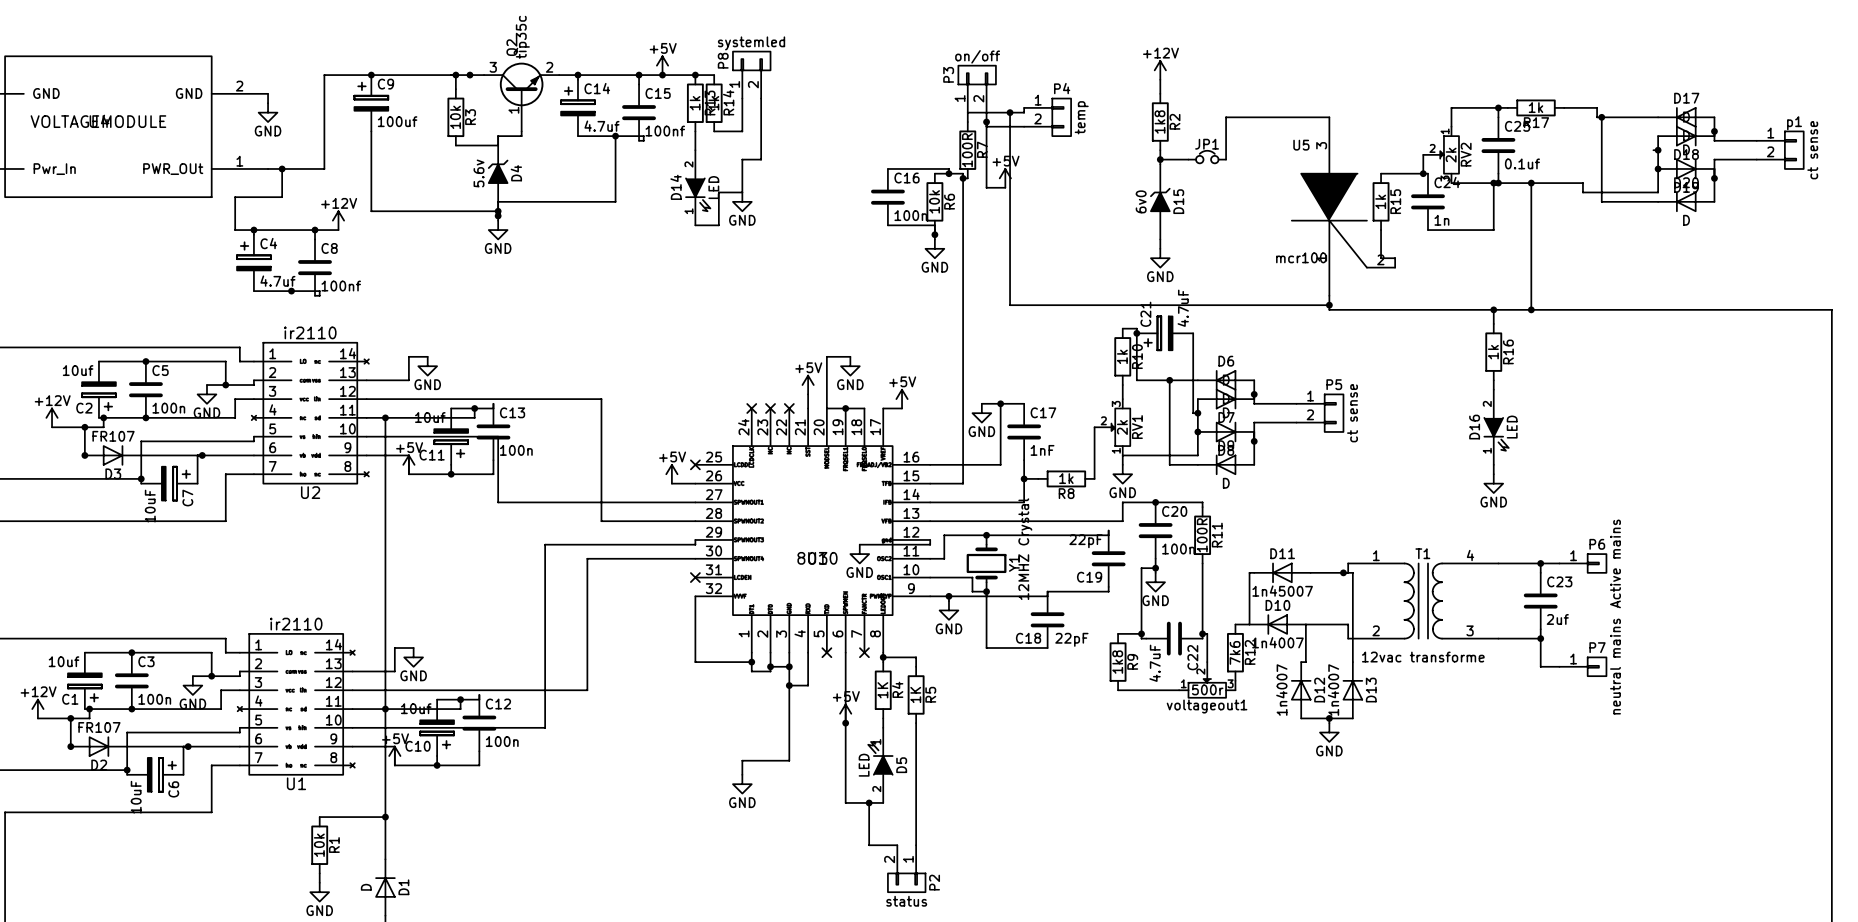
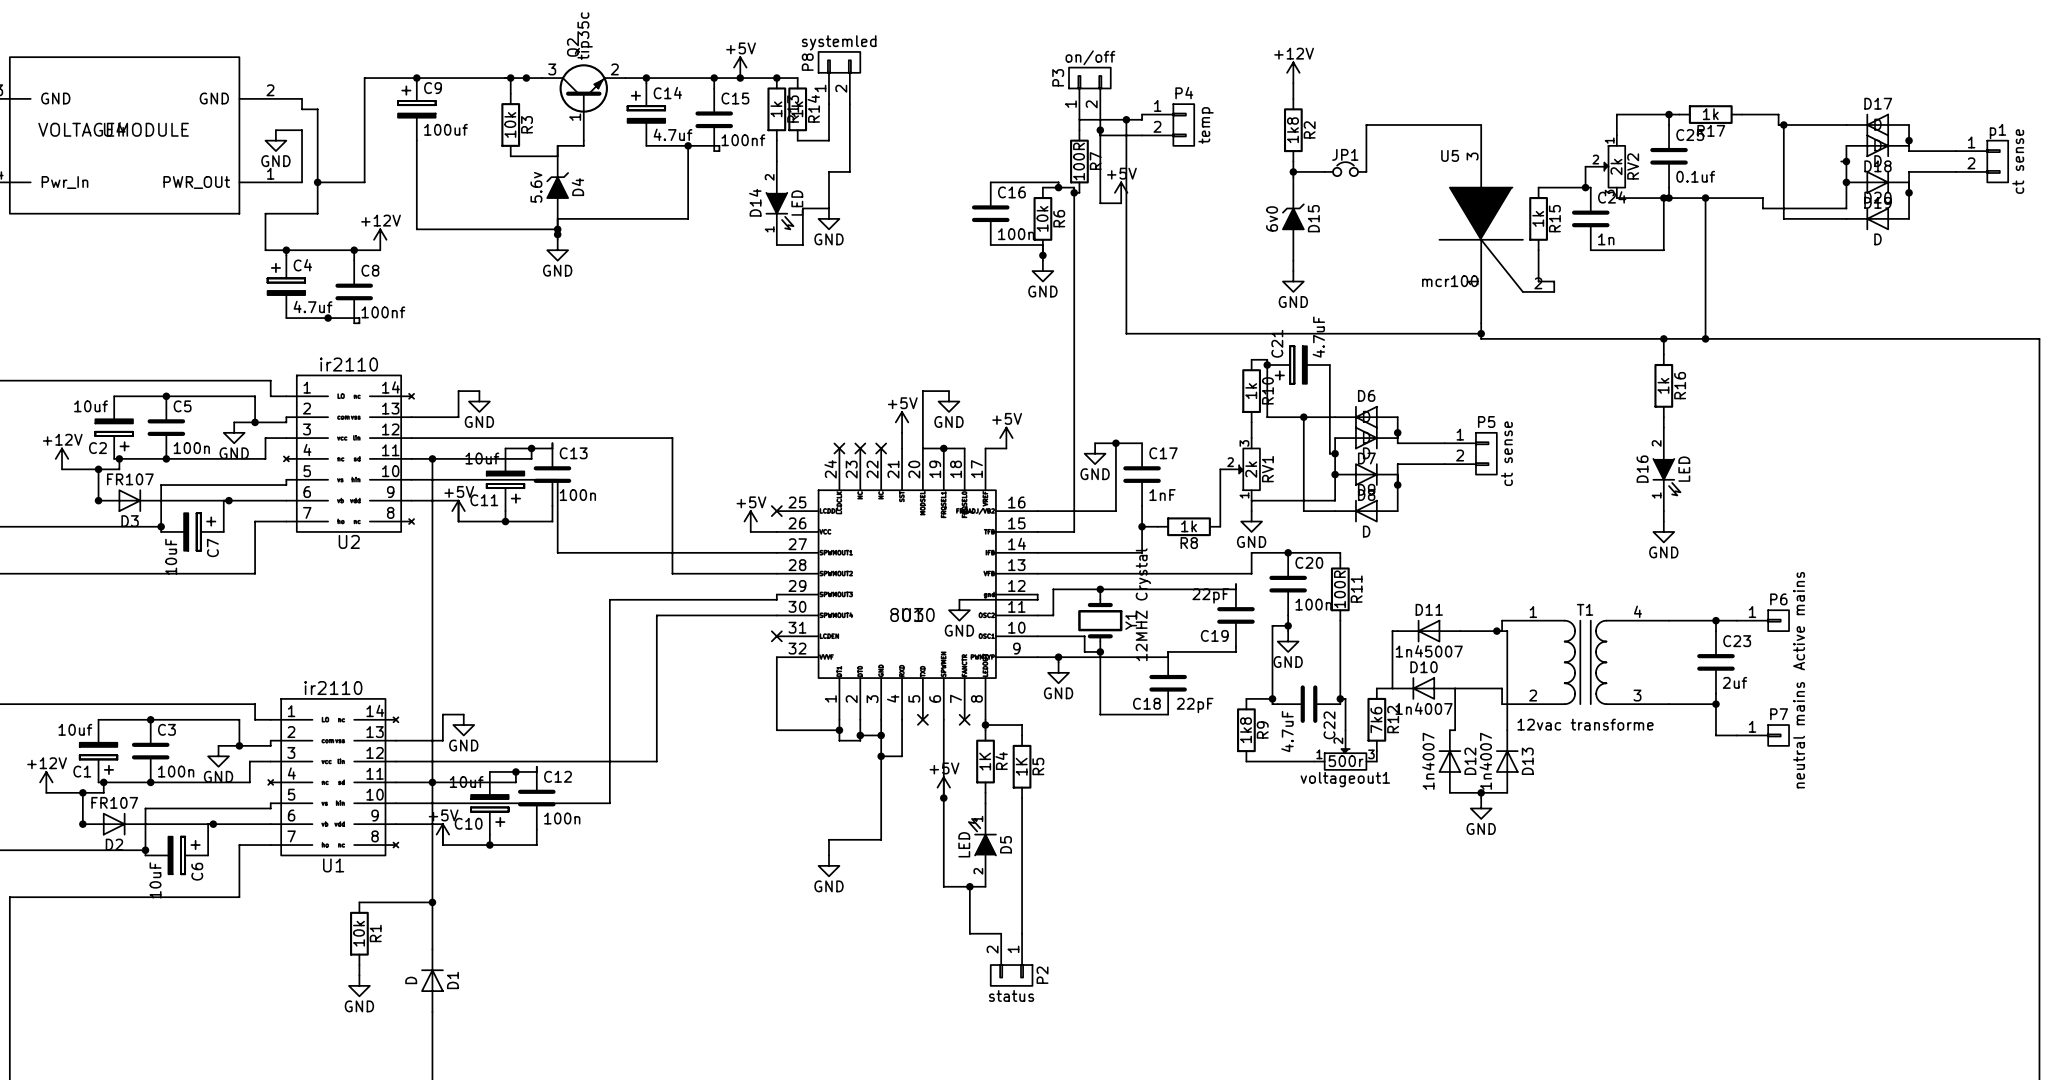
wire: none -> (302, 109) (317, 109) (317, 182)
power symbol position: GND (268, 112) -> GND (275, 140)
wire: (268, 168) (282, 168) -> (302, 182) (302, 130) (275, 130)

